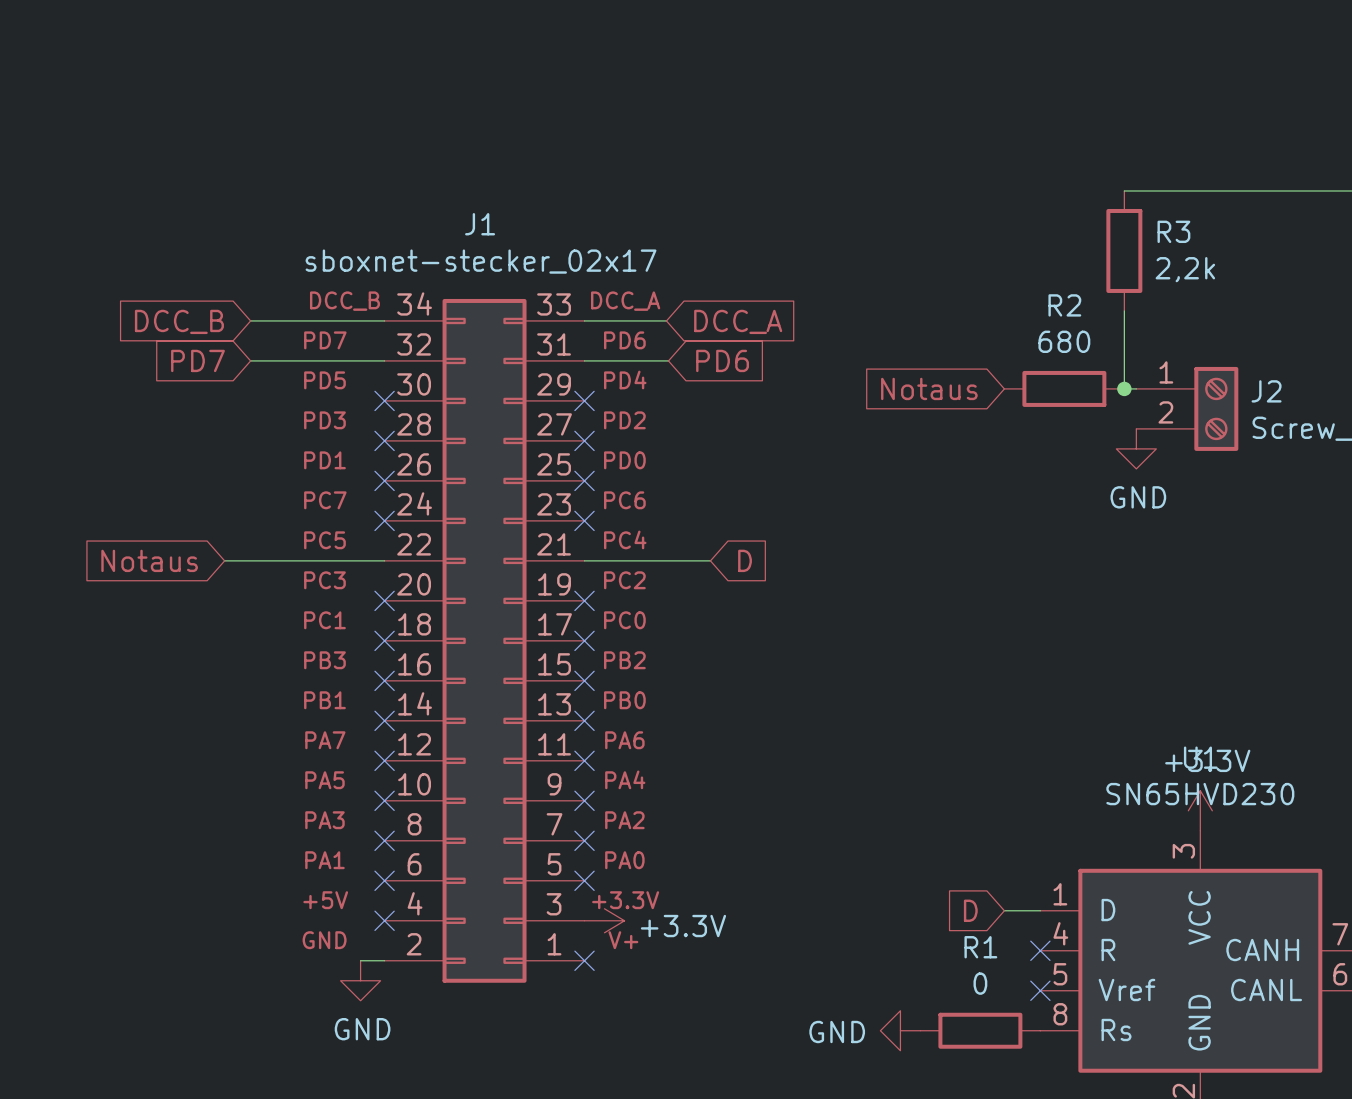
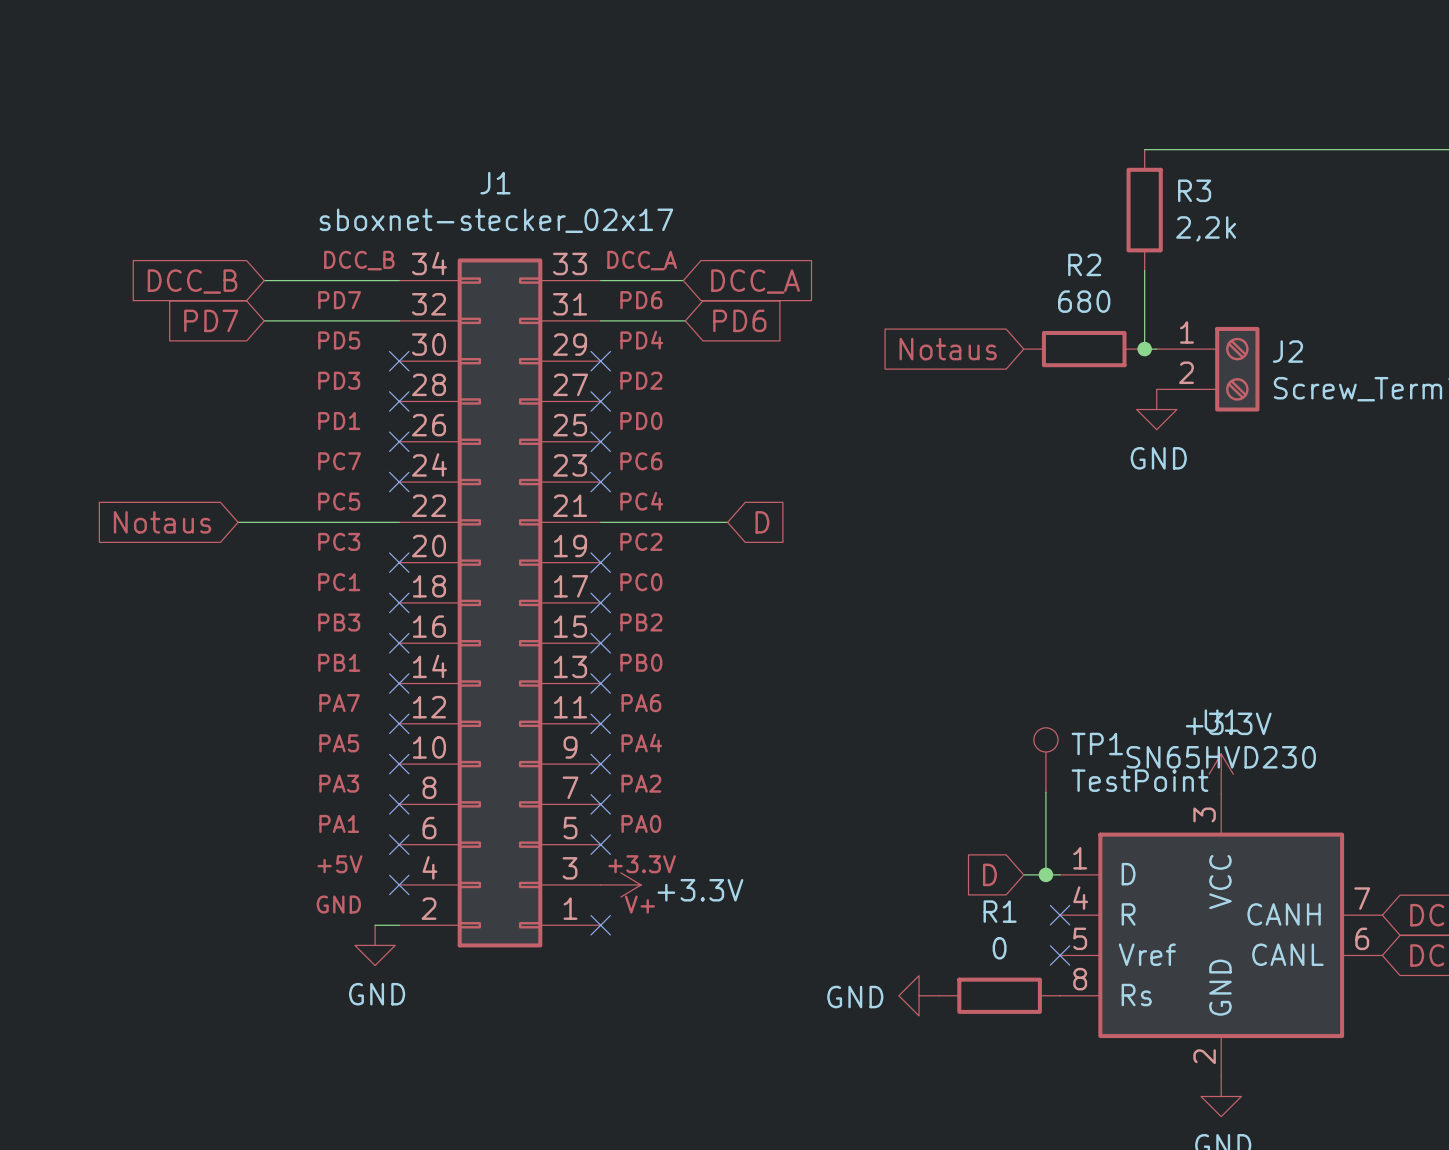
TP1: none -> TestPoint (1045, 760)
wire: none -> (1045, 792) (1045, 874)
junction: none -> (1045, 874)

